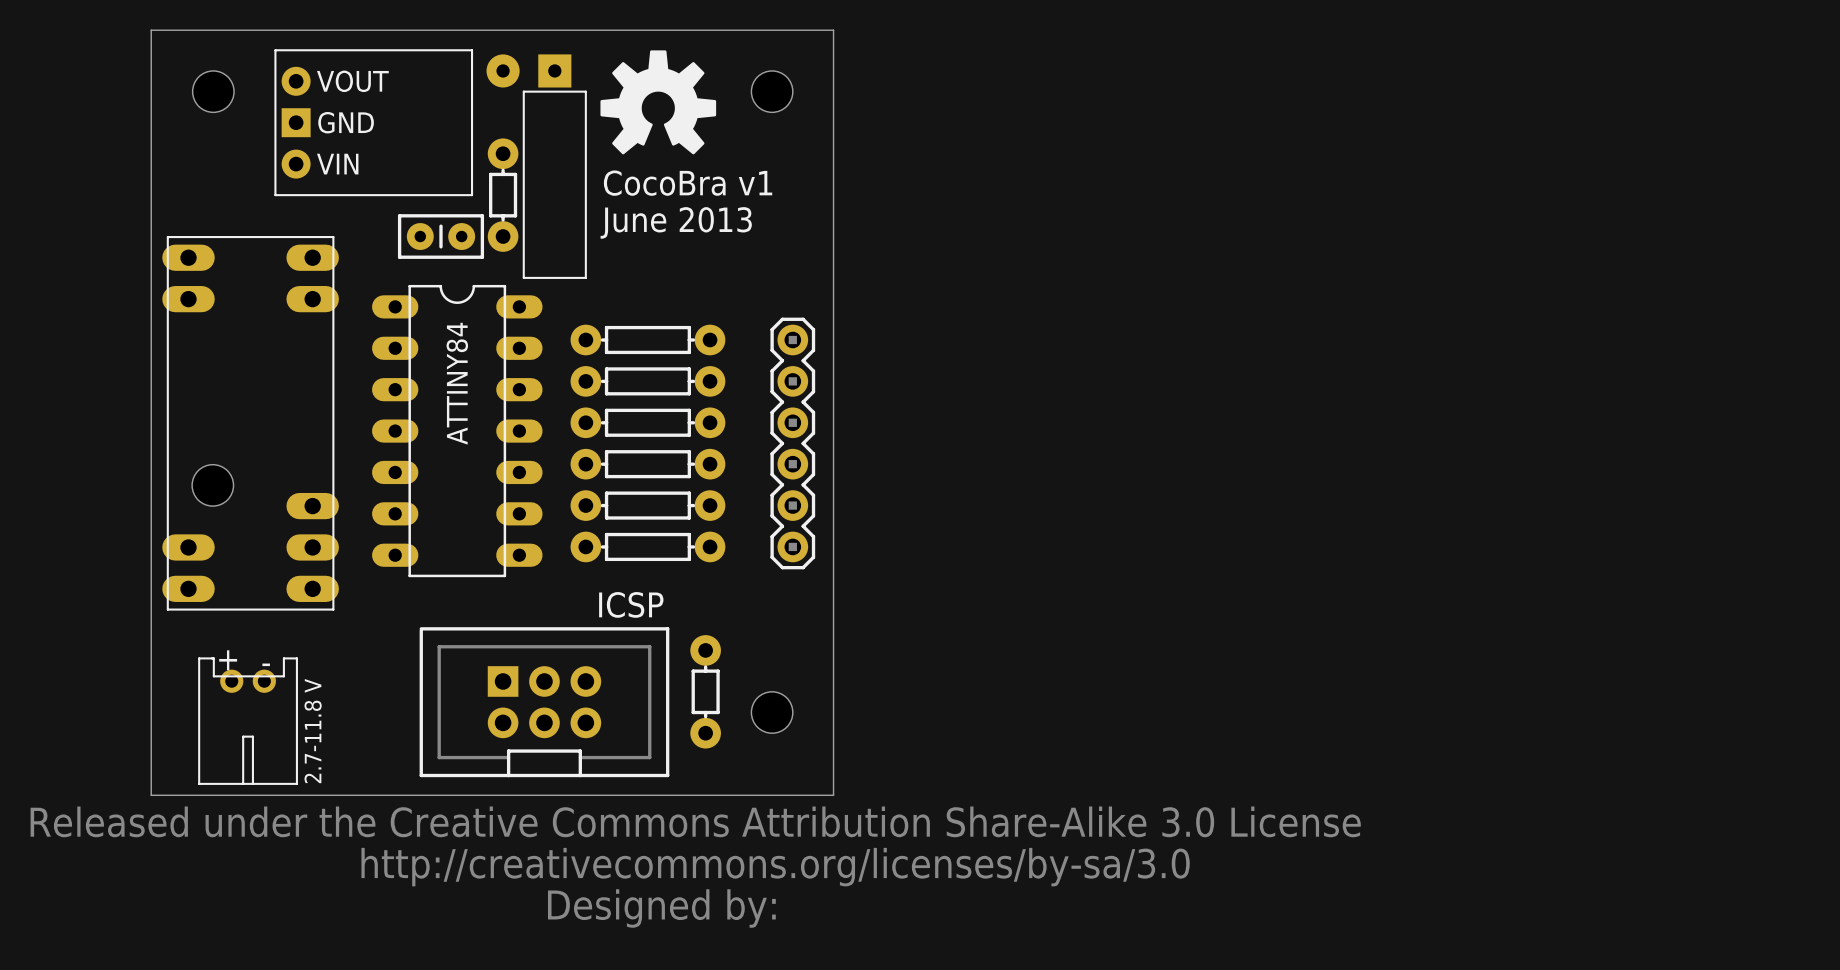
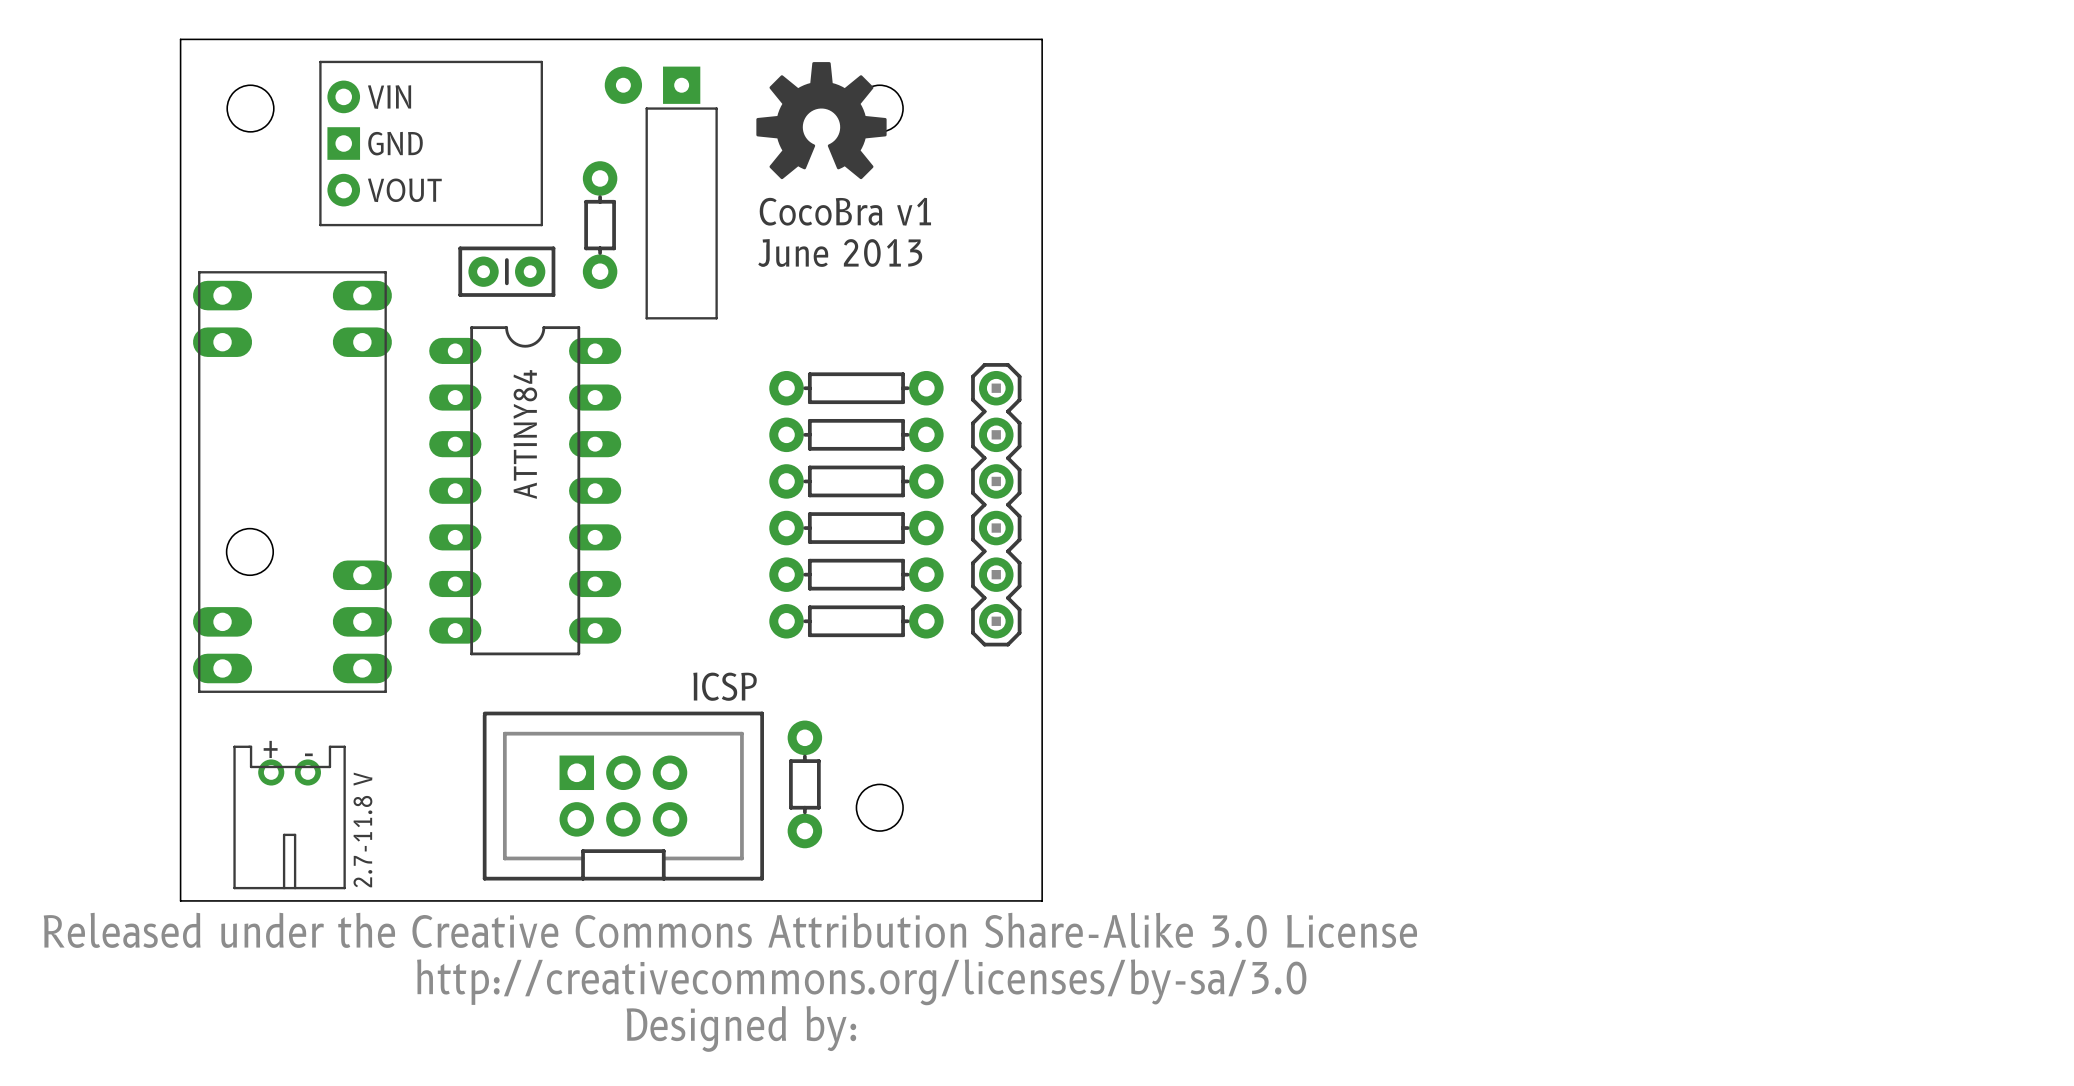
board edge: (833, 30) (833, 795) -> (948, 39) (1042, 39) (1042, 900) (948, 900)
part text: VOUT (352, 81) -> VIN (389, 97)
drawing position: (658, 102) -> (821, 120)
part text: VIN (337, 164) -> VOUT (404, 190)
part position: (536, 166) -> (661, 193)
text position: CocoBra v1 (688, 183) -> CocoBra v1 (845, 211)
part position: (503, 195) -> (600, 225)
text position: June 2013 (676, 222) -> June 2013 (840, 252)
part: (647, 340) -> none
part: none -> (856, 388)
part: (647, 381) -> none
part: none -> (856, 434)
part: (647, 422) -> none
part: none -> (856, 481)
part position: (792, 443) -> (996, 504)
part: (647, 464) -> none
part: none -> (856, 528)
part: (647, 505) -> none
part: none -> (856, 574)
part: (647, 546) -> none
part: none -> (856, 621)

